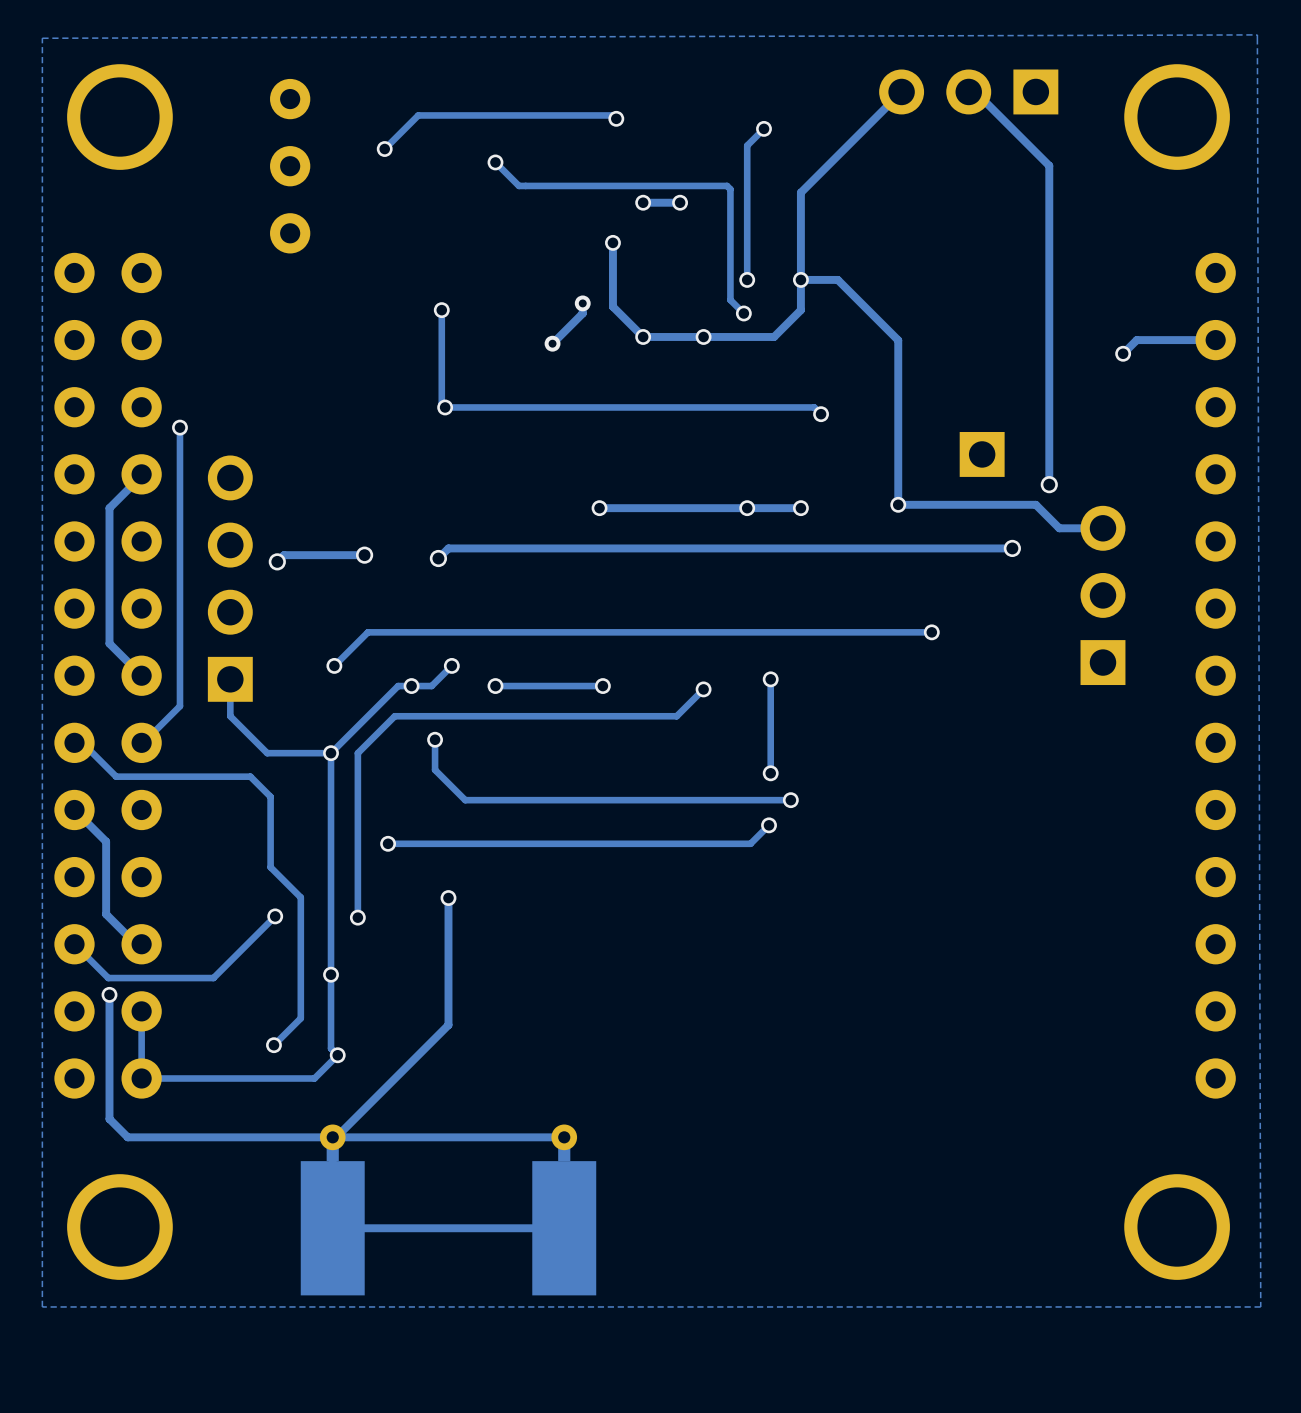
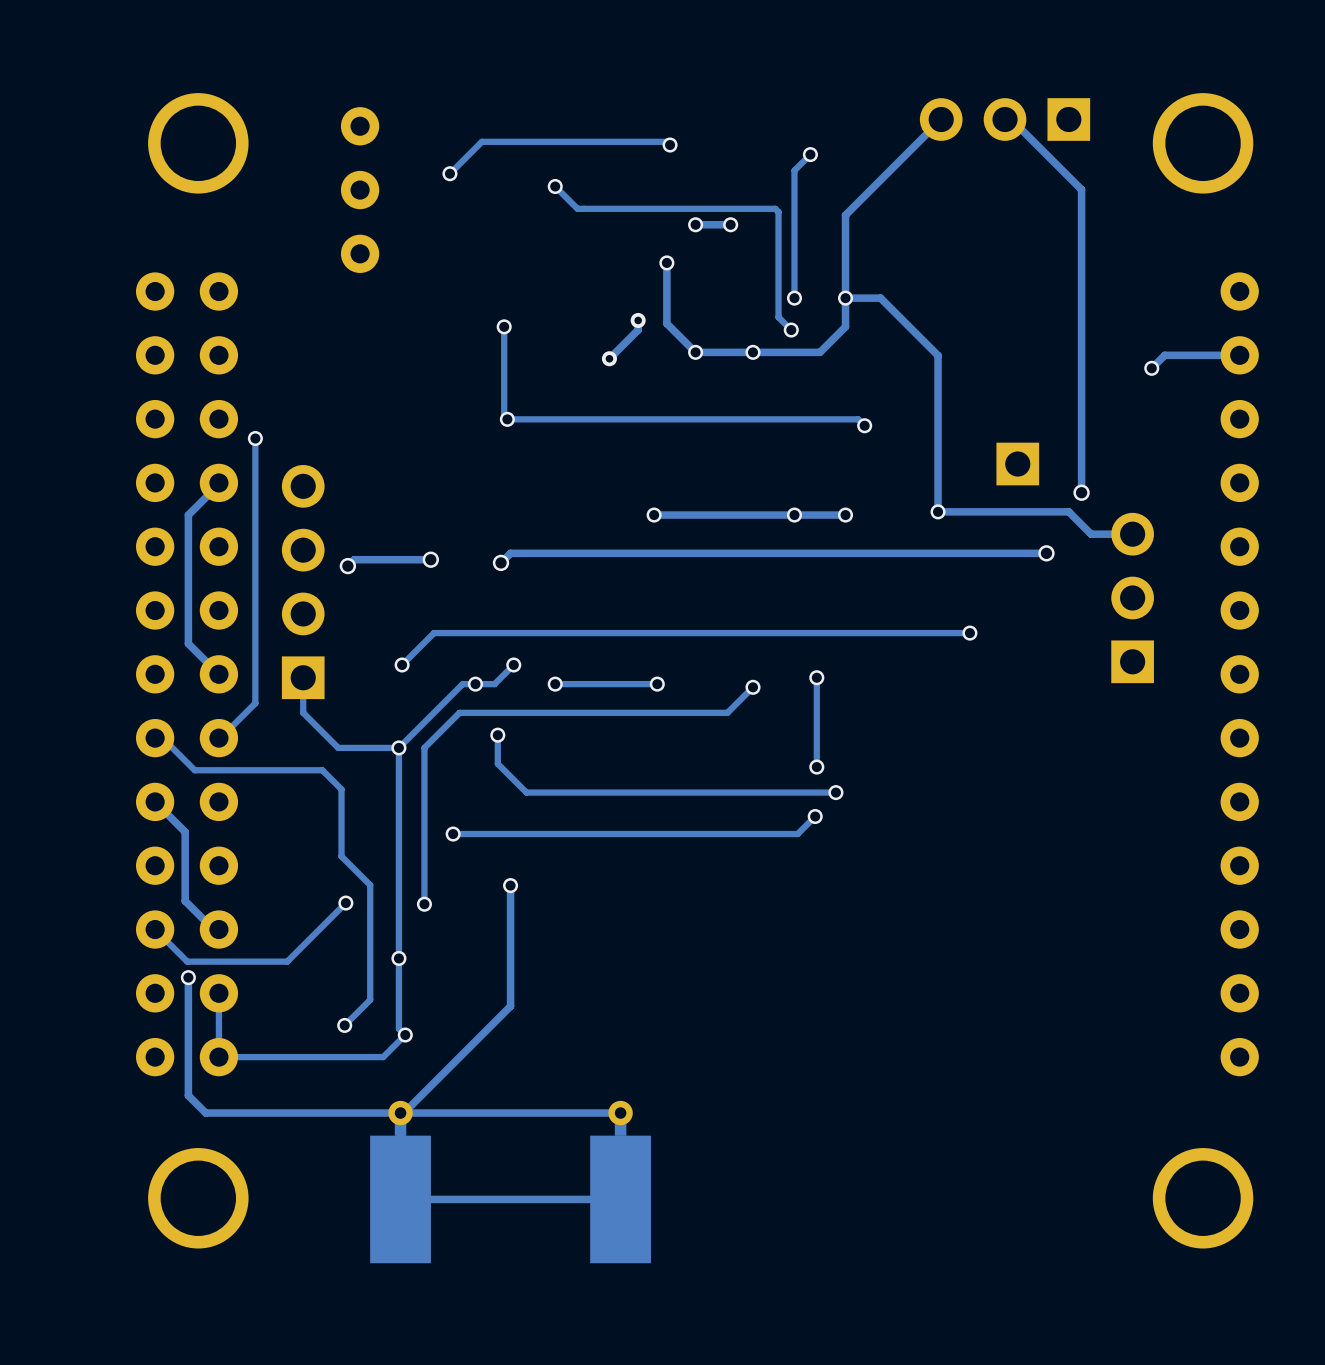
zone outline: (1257, 34) (42, 38) (42, 1306) (1260, 1306) (1257, 34) -> none

